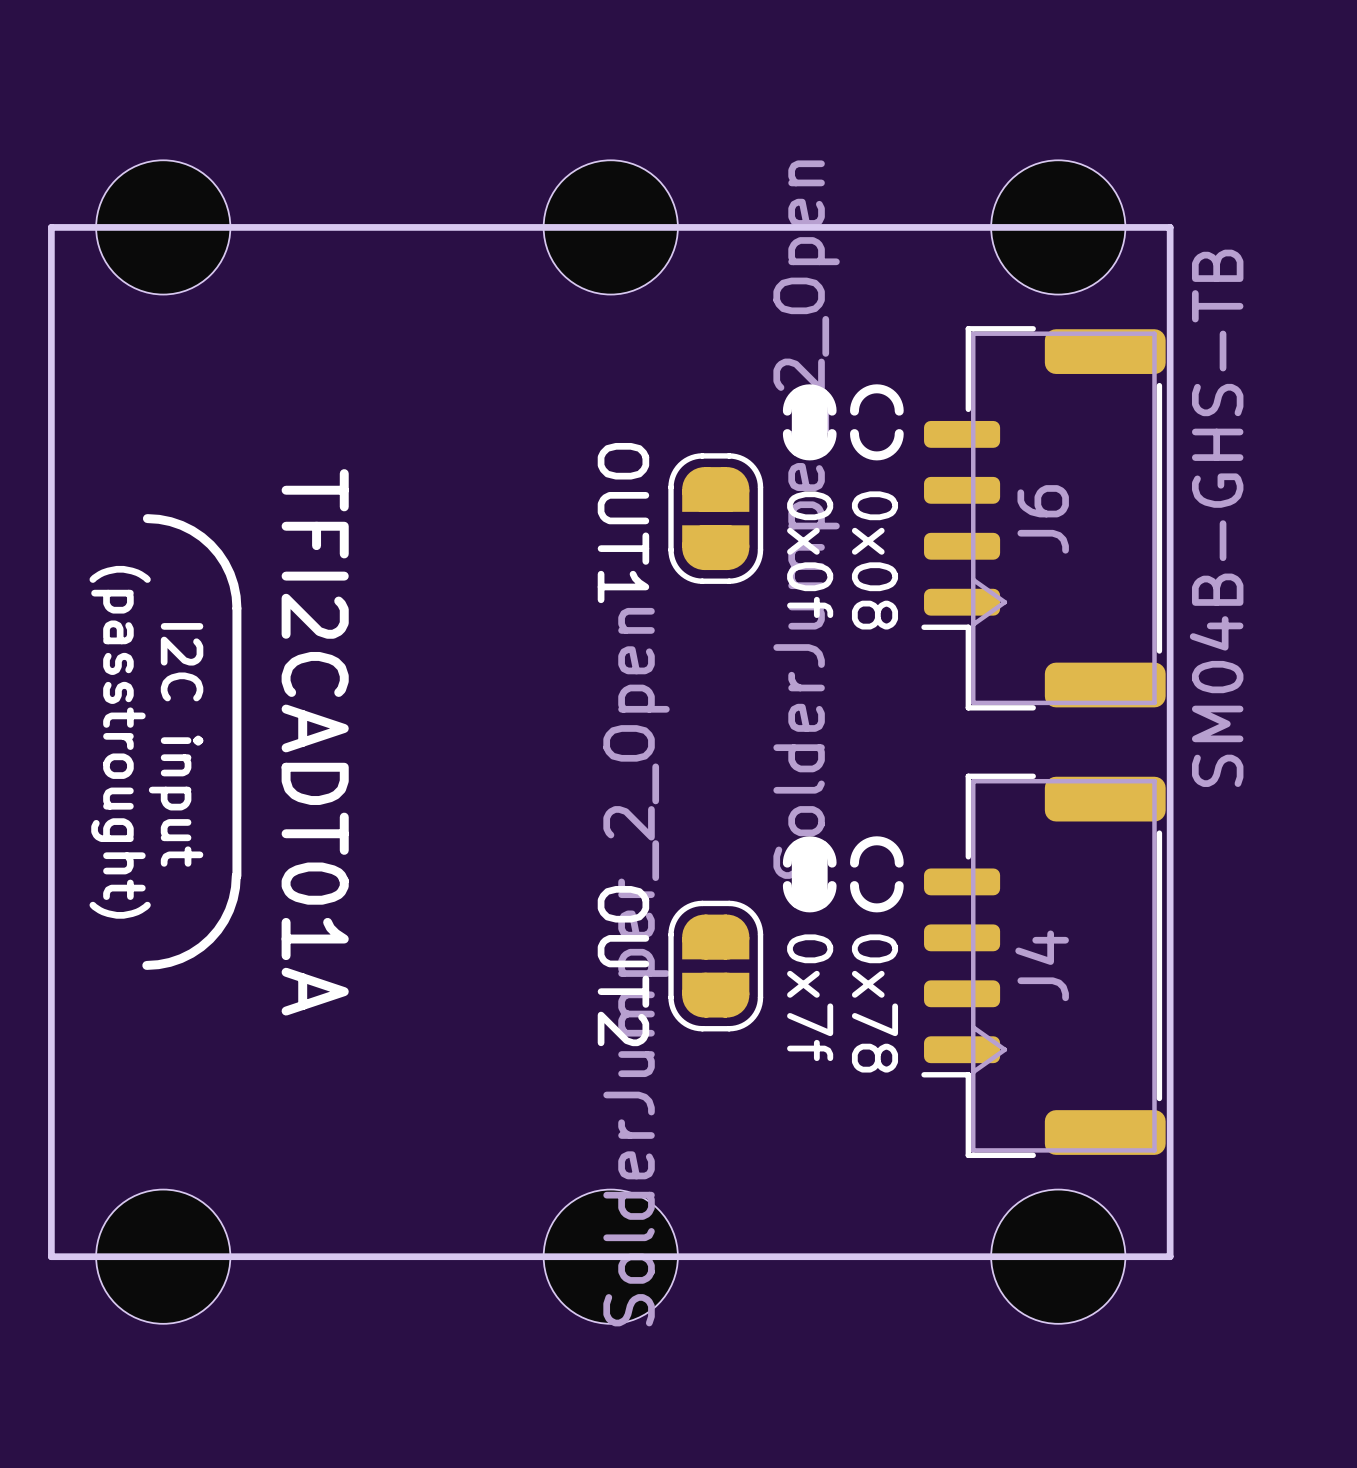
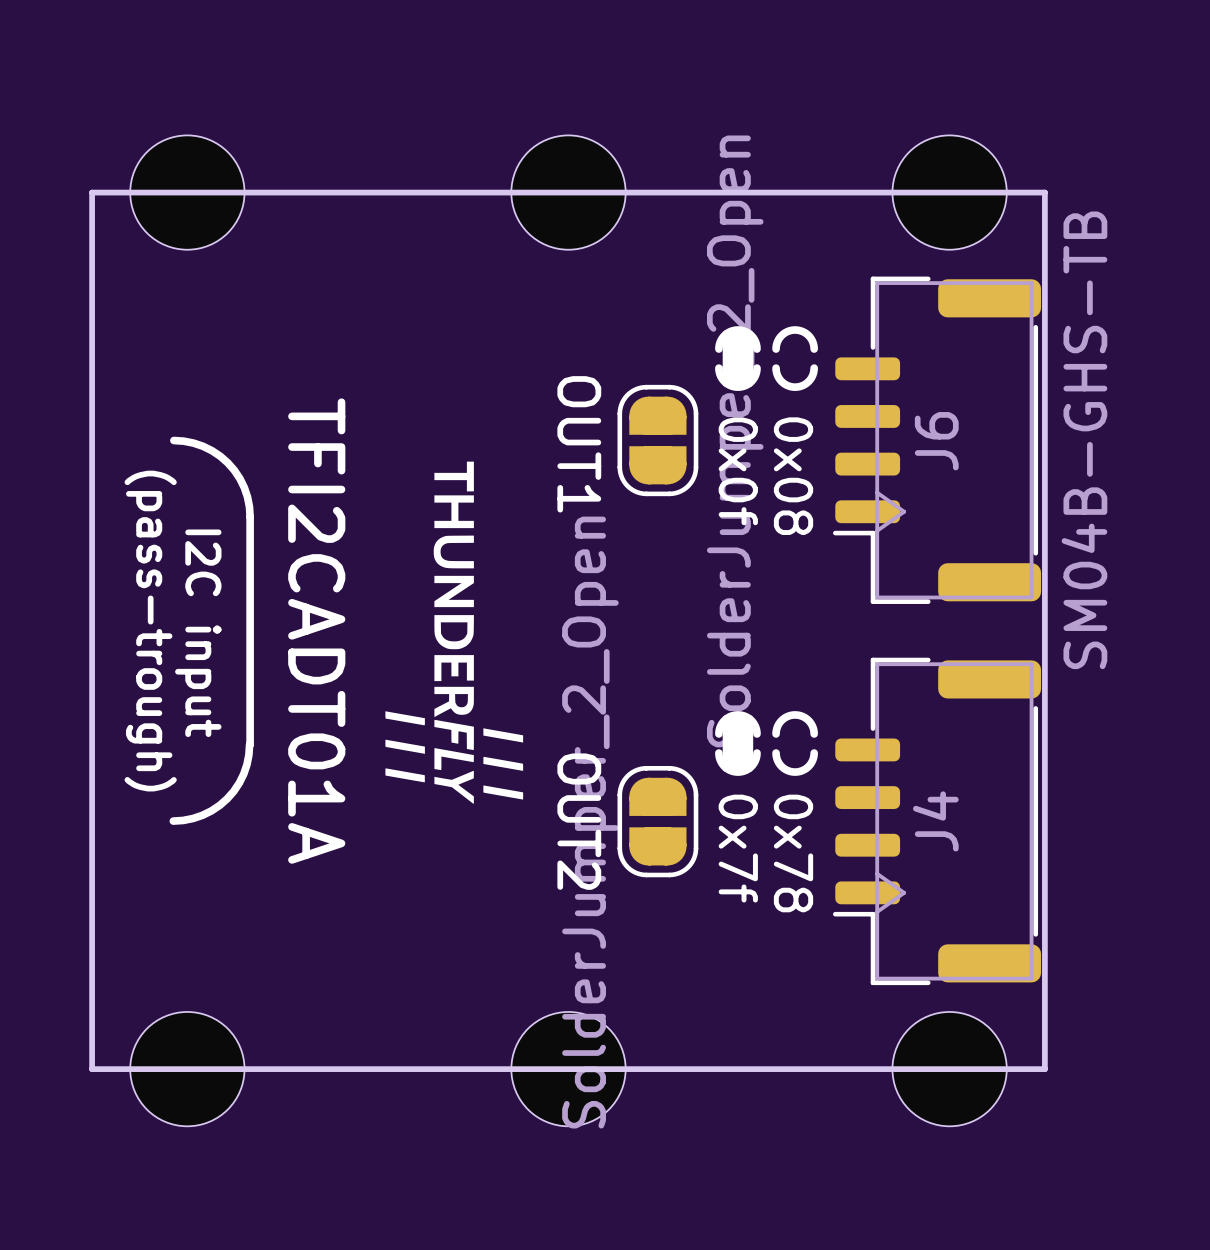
drawing: none -> [385, 461, 524, 804]
text: (passtrought) (120, 742) -> (pass-trough) (150, 631)

